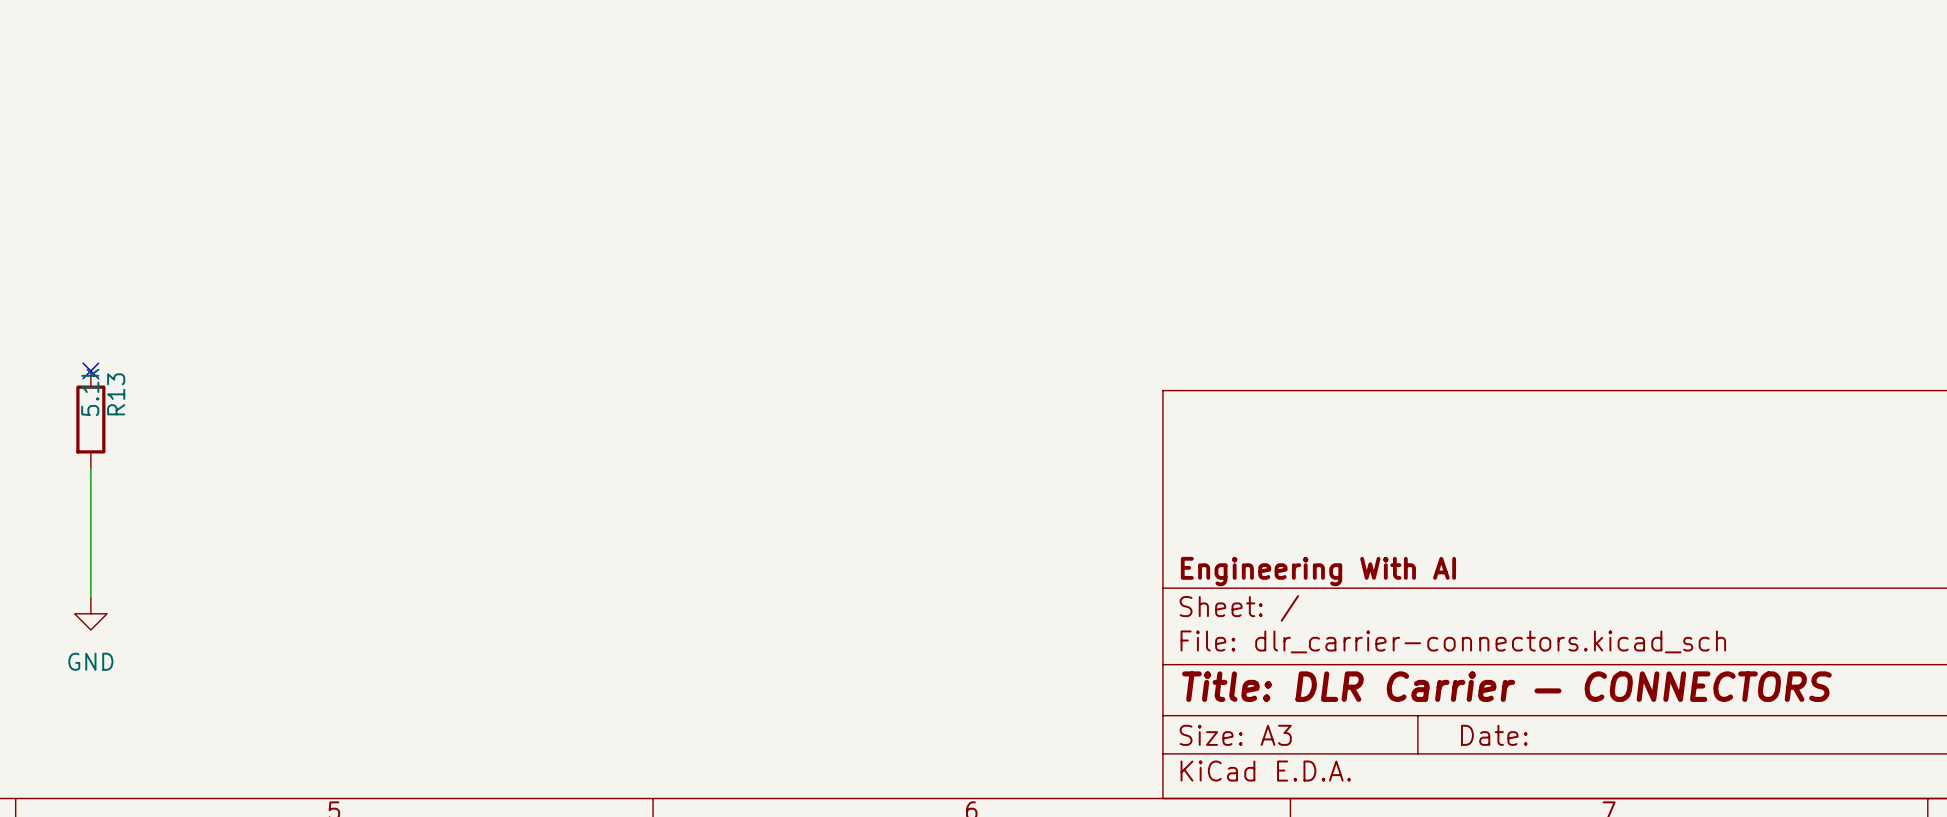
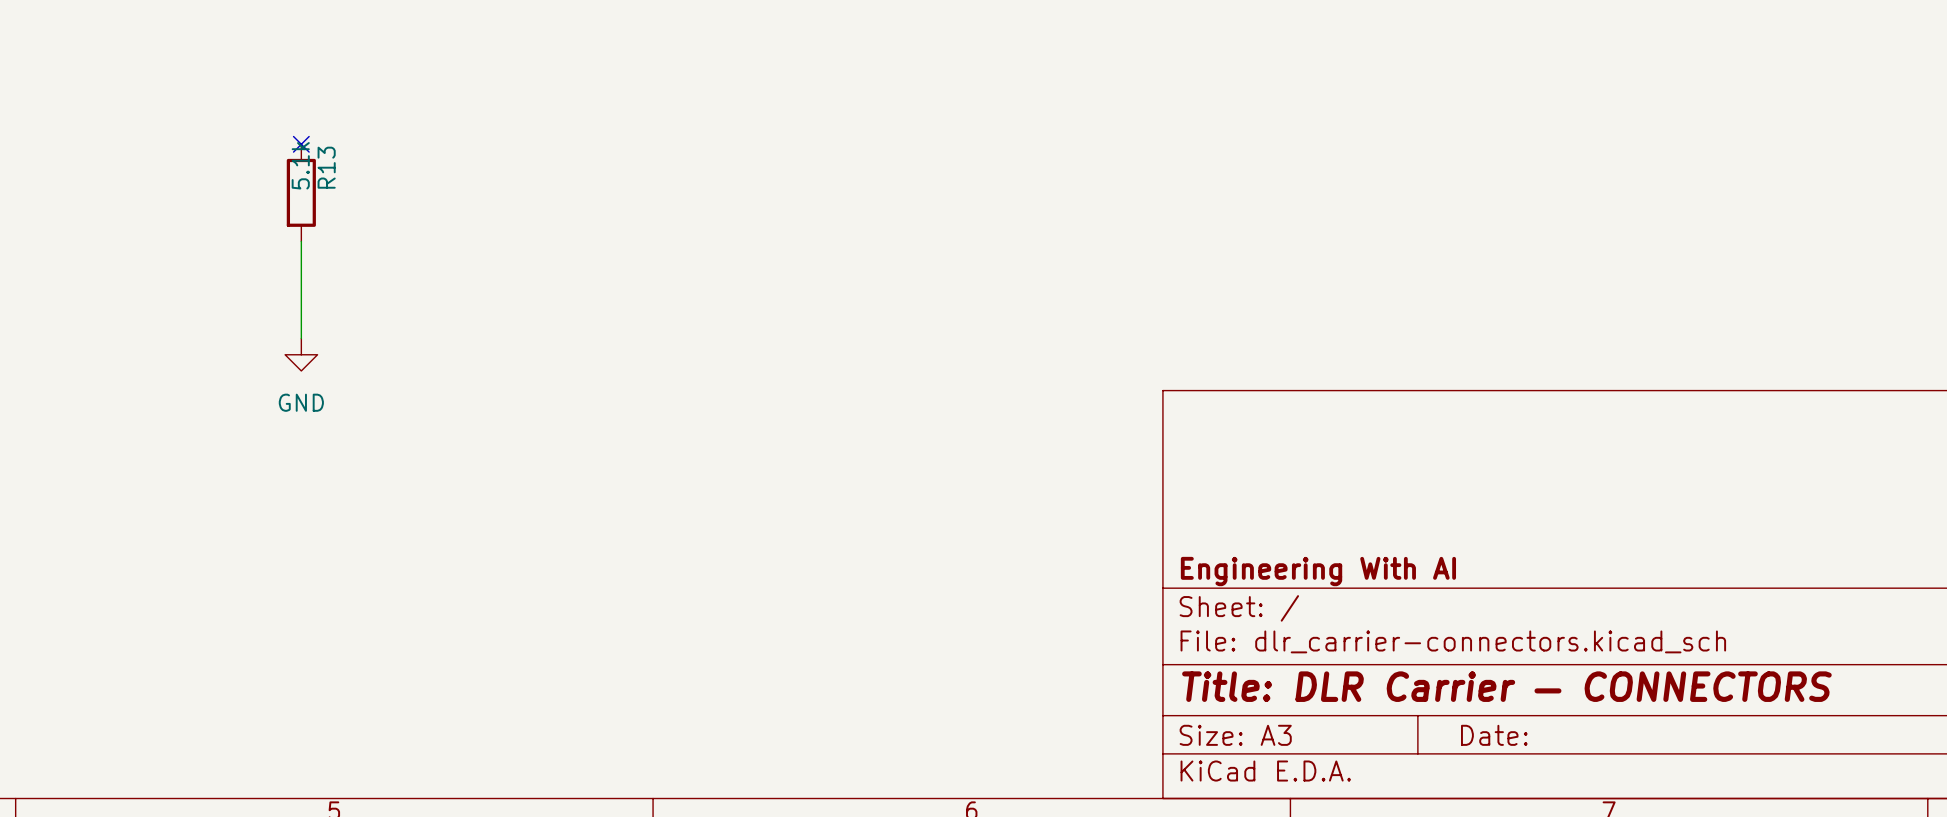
no-connect mark: none -> (301, 144)
wire: none -> (301, 241) (301, 338)
power symbol: none -> GND (301, 354)
no-connect mark: (90, 370) -> none
R13 position: (90, 419) -> (301, 192)
wire: (90, 468) (90, 597) -> none
power symbol: GND (90, 613) -> none

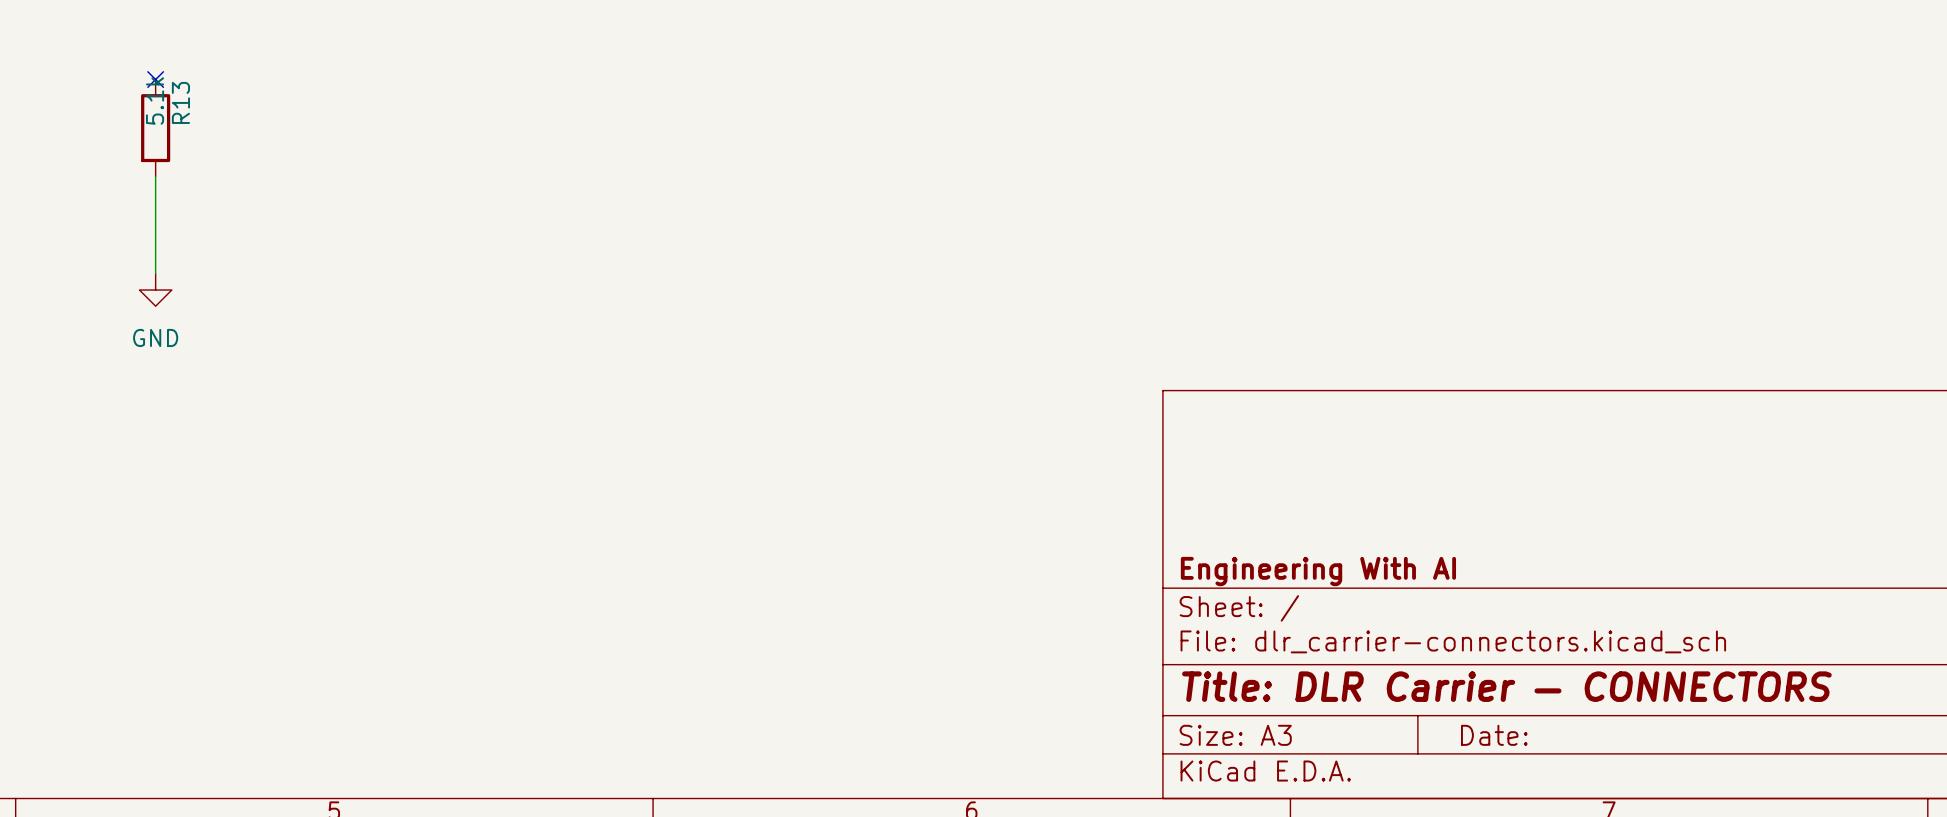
no-connect mark: none -> (155, 79)
no-connect mark: (301, 144) -> none
R13 position: (301, 192) -> (155, 128)
wire: (301, 241) (301, 338) -> (155, 176) (155, 273)
power symbol position: GND (301, 354) -> GND (155, 290)

